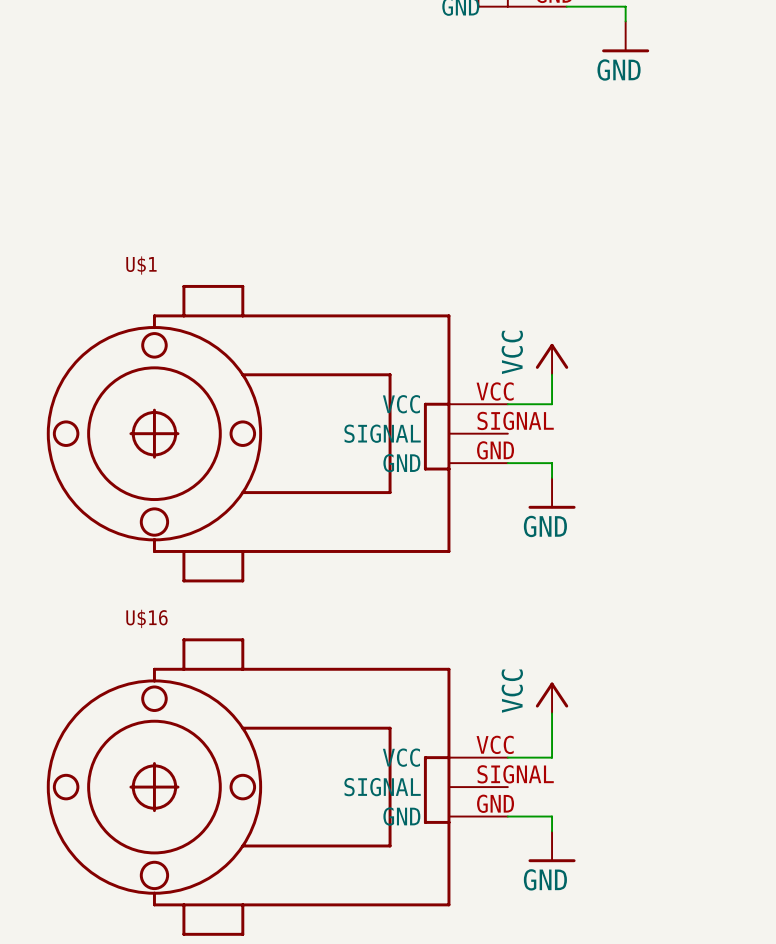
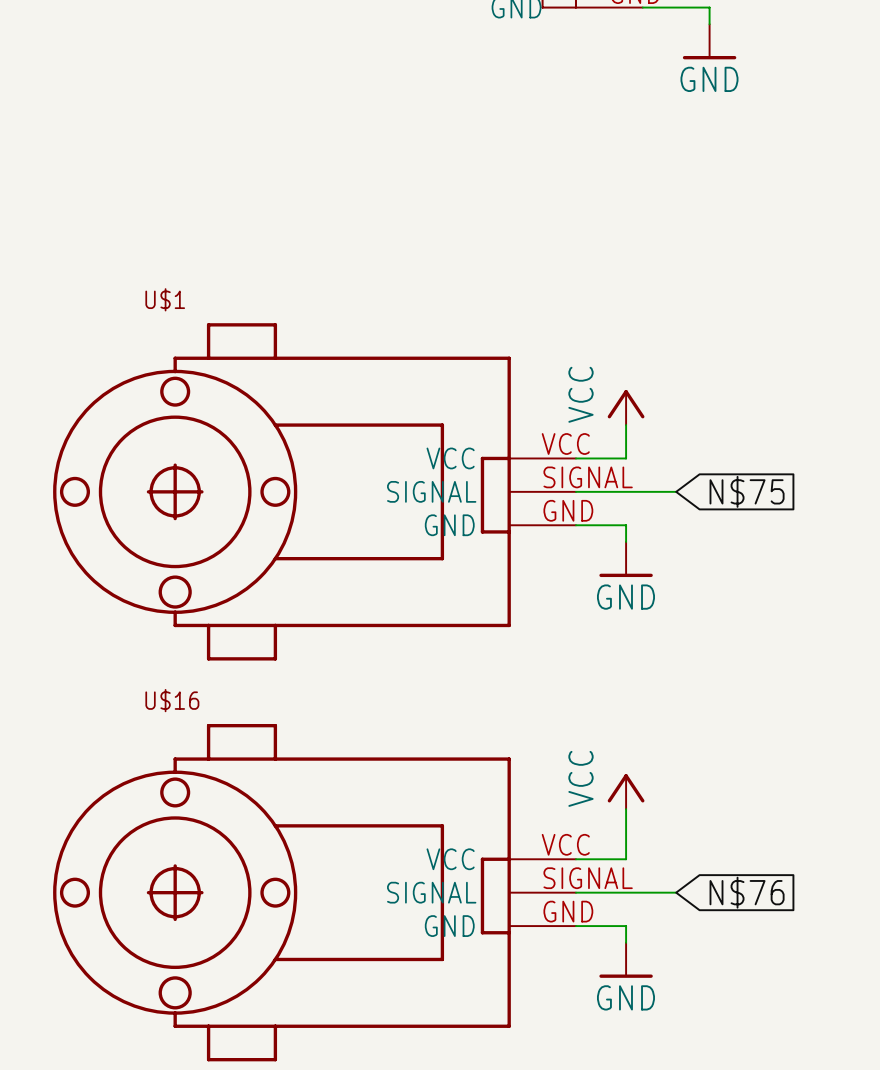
wire: none -> (575, 491) (676, 491)
global label: none -> N$75 (747, 491)
wire: none -> (575, 892) (676, 892)
global label: none -> N$76 (747, 892)

